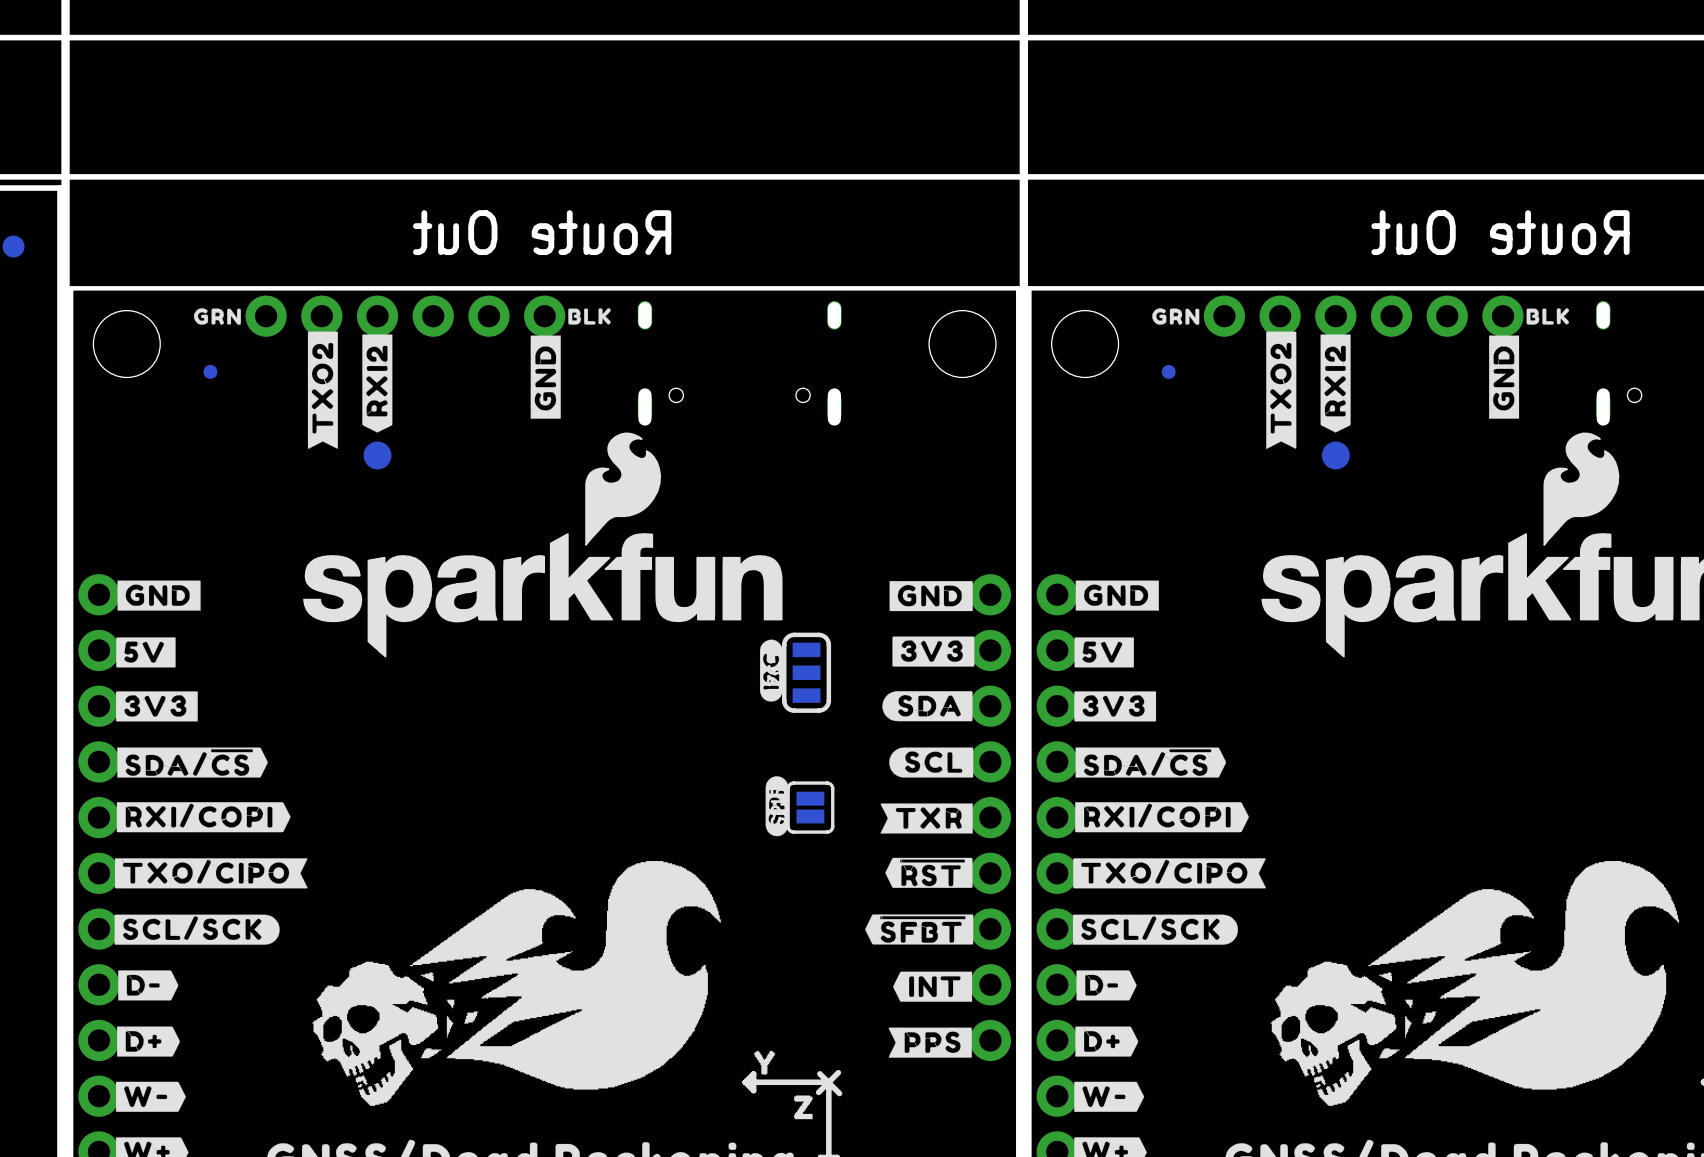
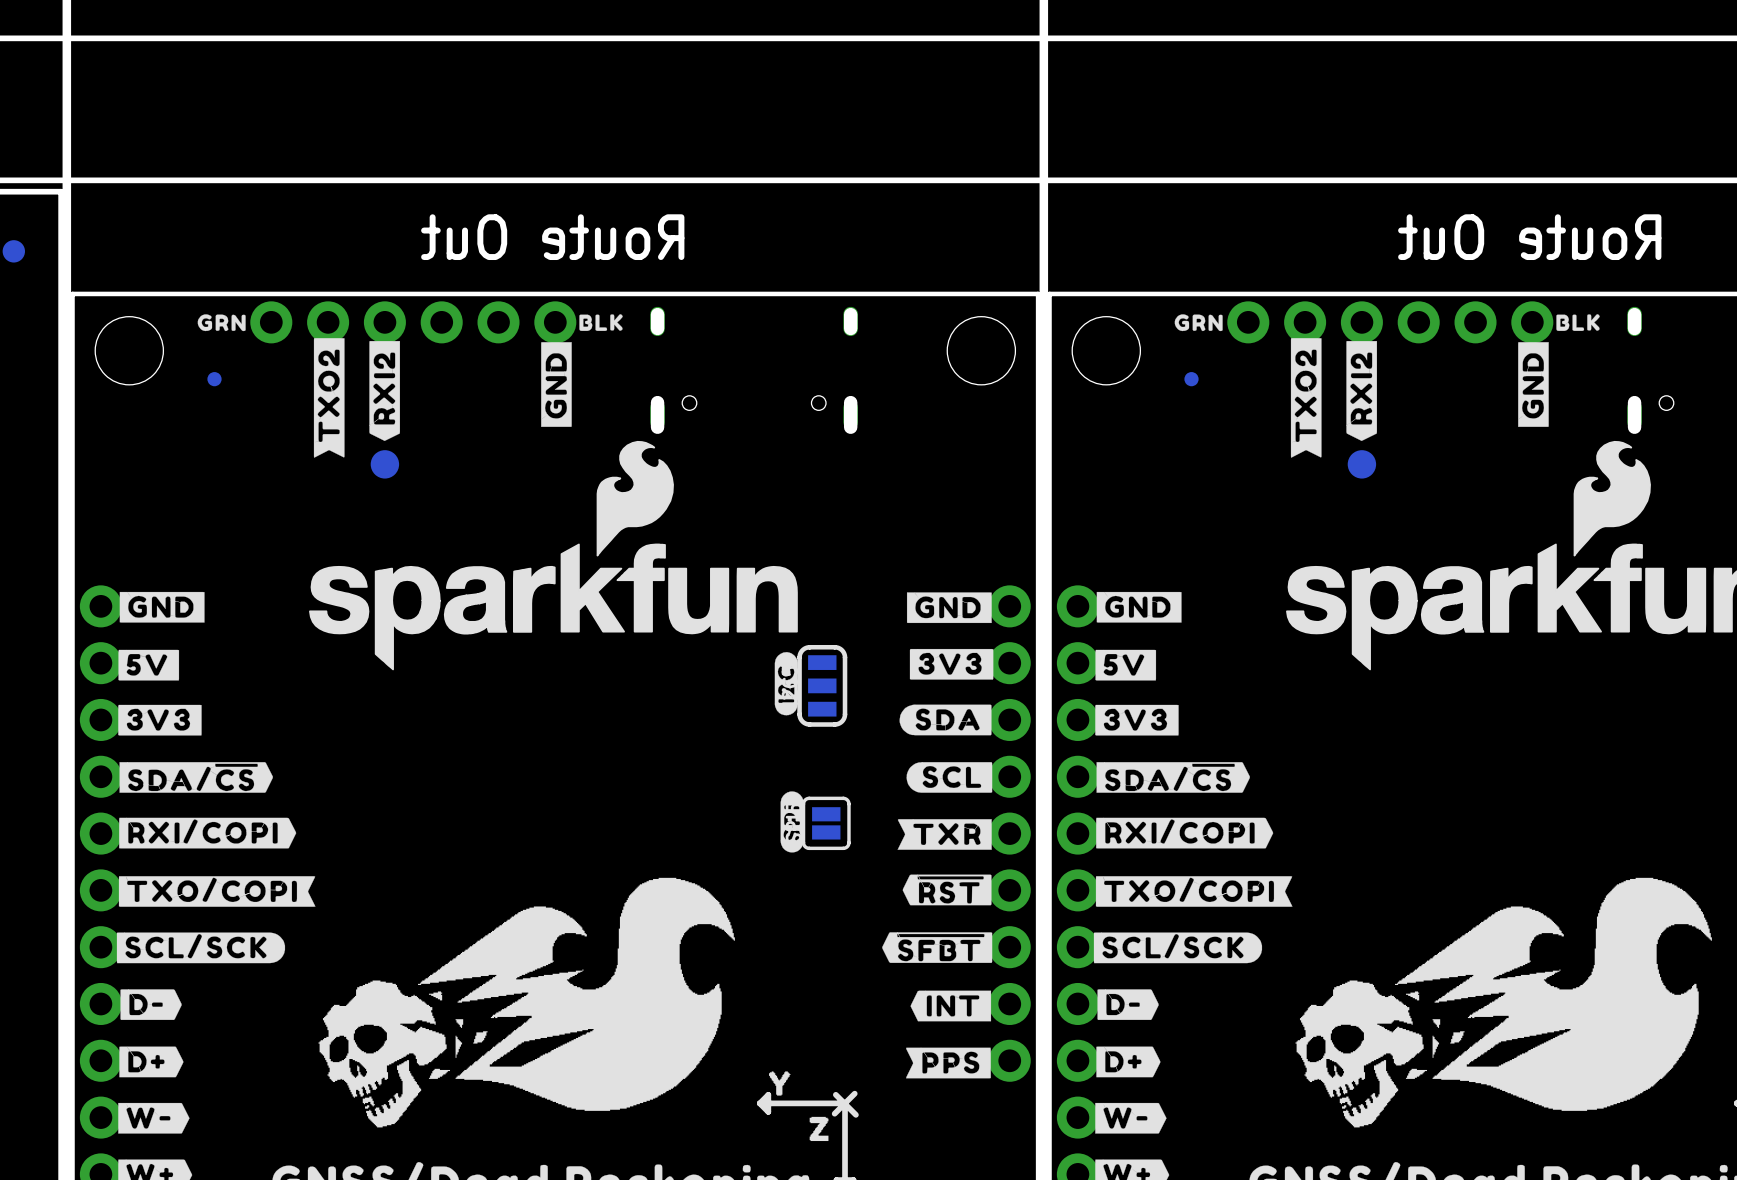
drawing shape: [114, 858, 308, 889] -> [118, 876, 316, 907]
drawing shape: [1073, 858, 1267, 889] -> [1095, 876, 1293, 907]

